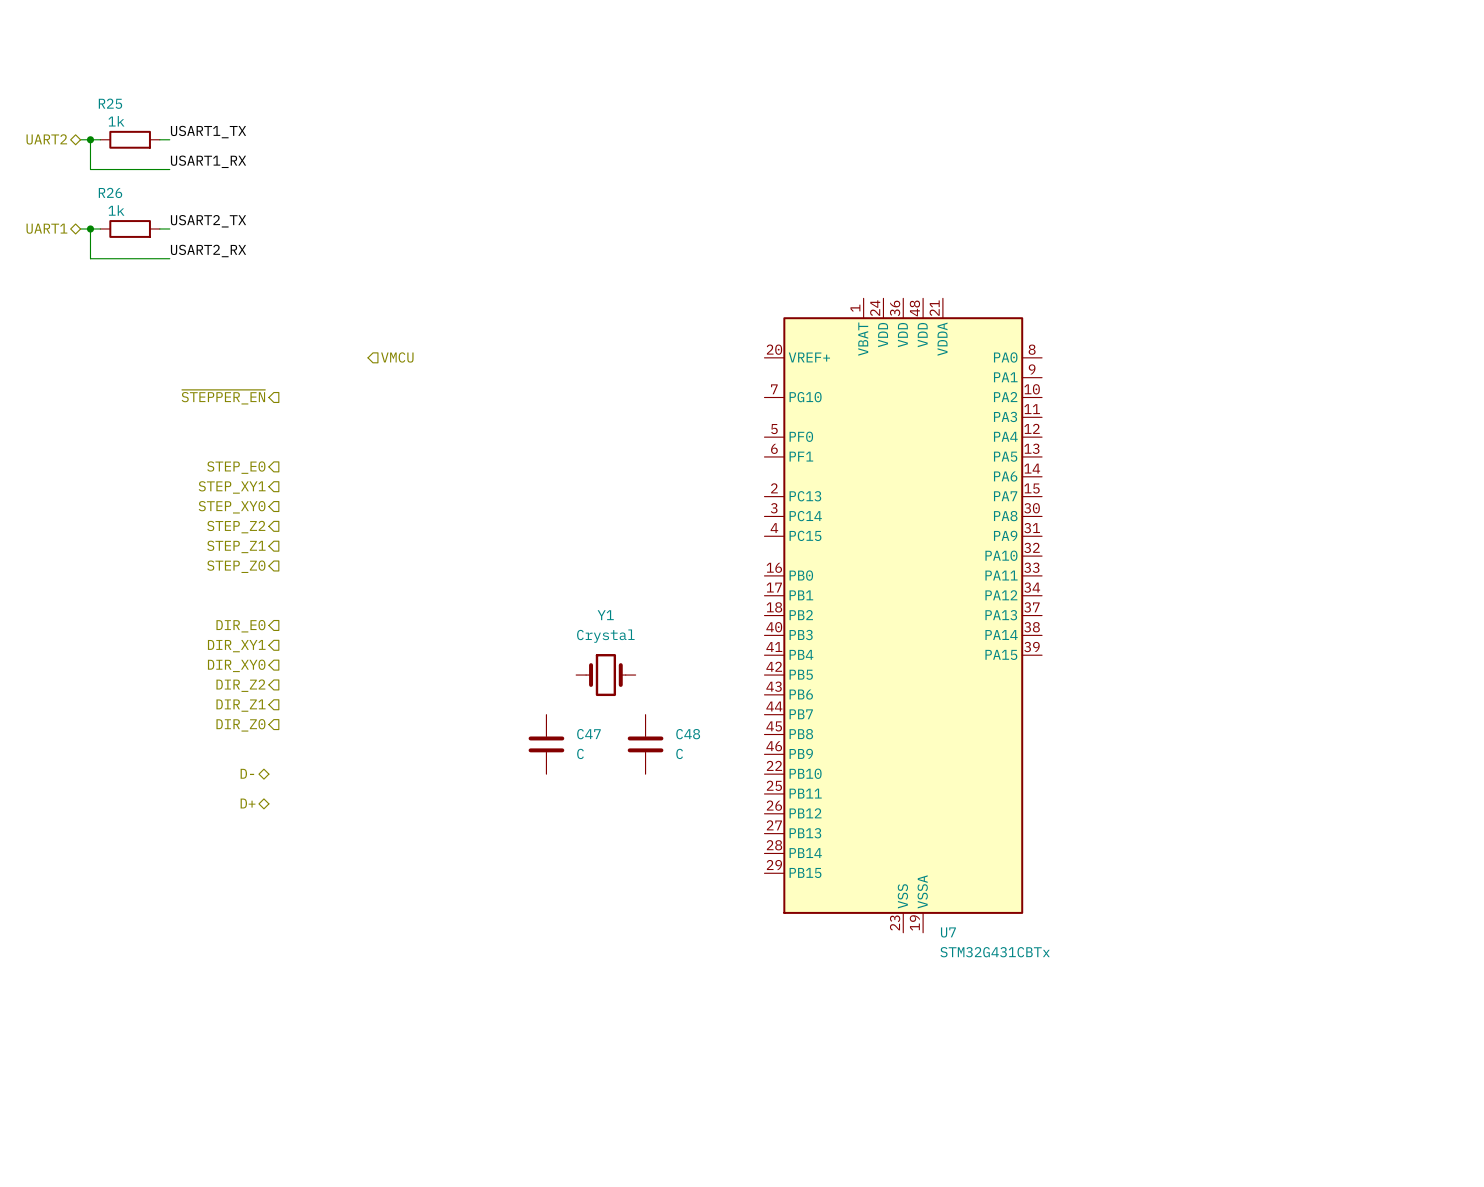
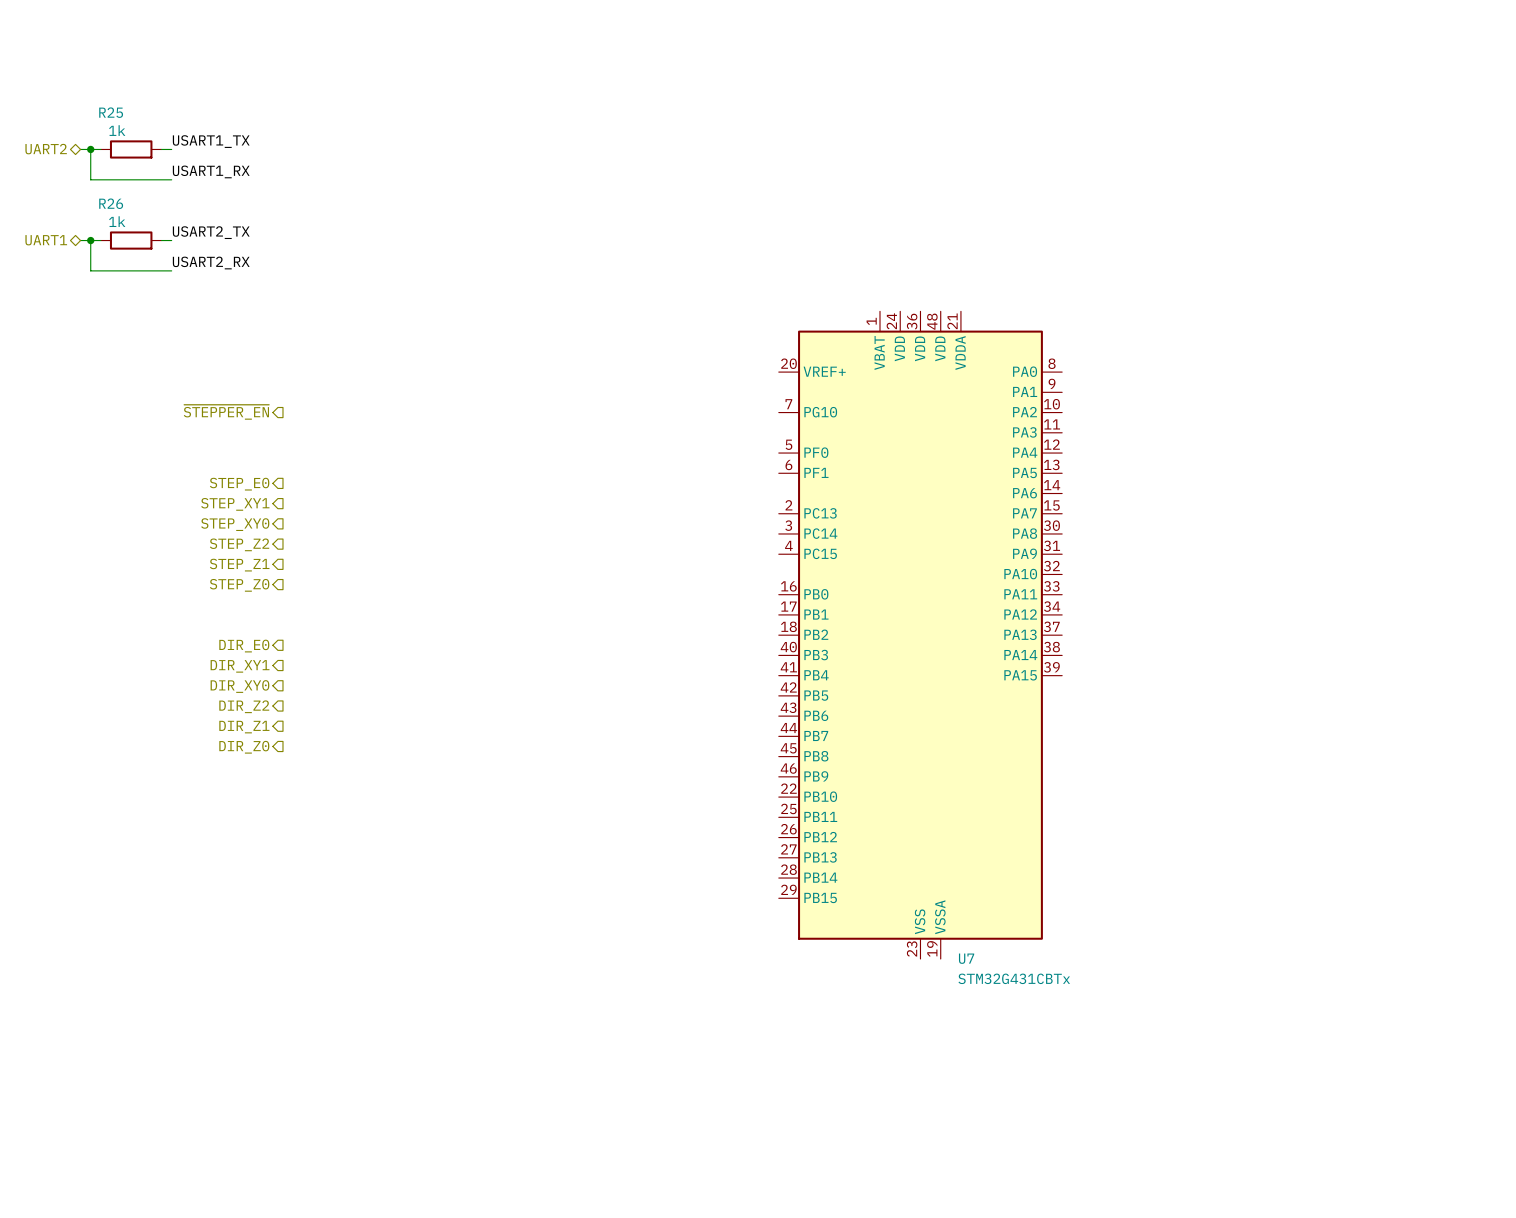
hierarchical label: VMCU (397, 357) -> none
Y1: Crystal (605, 675) -> none
C47: C (546, 744) -> none
C48: C (645, 744) -> none
hierarchical label: D- (247, 773) -> none
hierarchical label: D+ (248, 803) -> none

